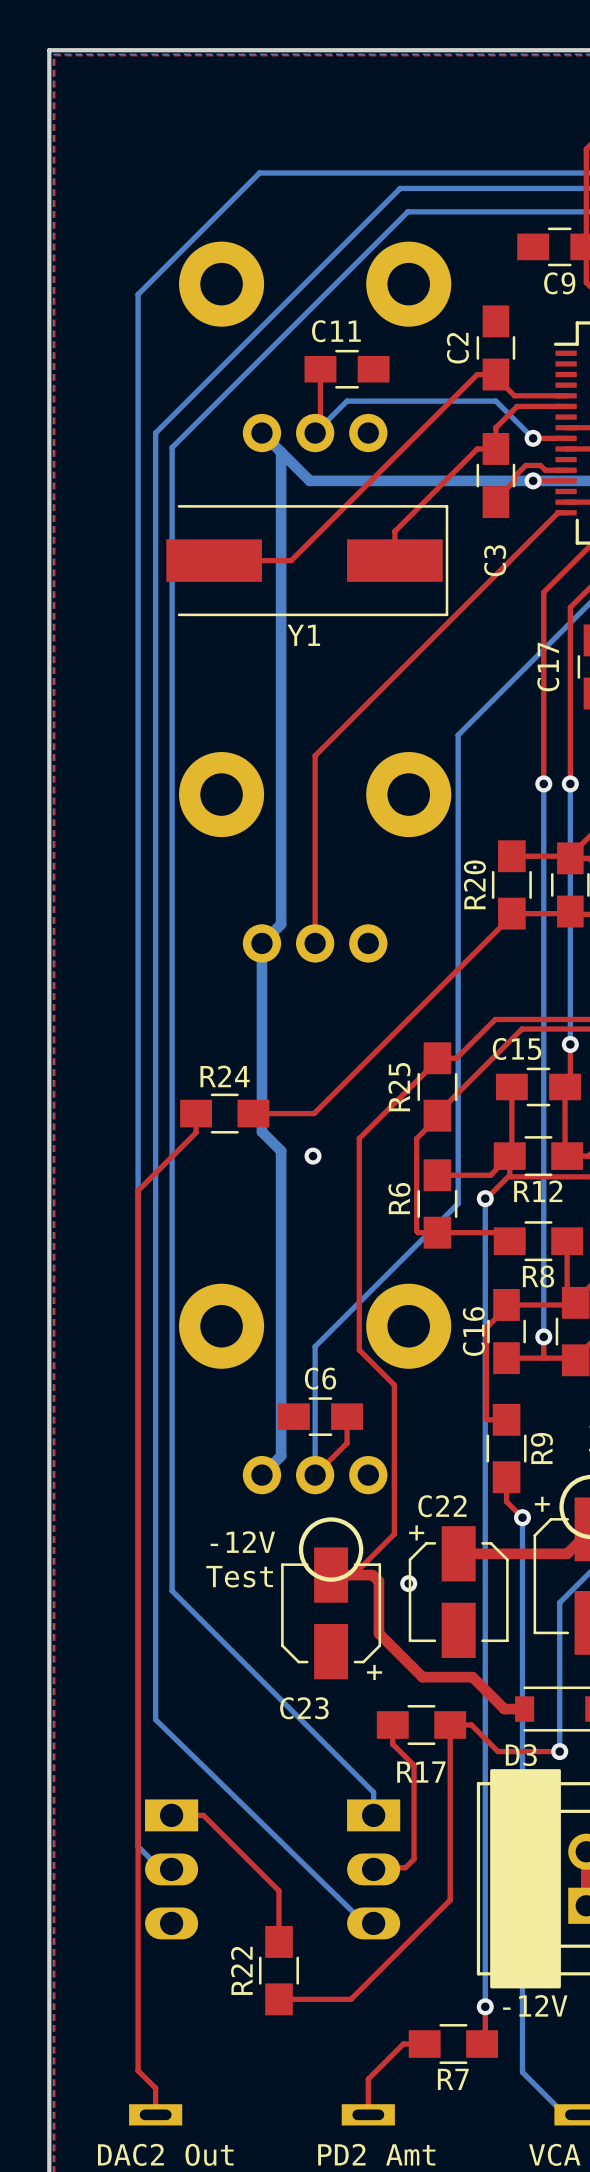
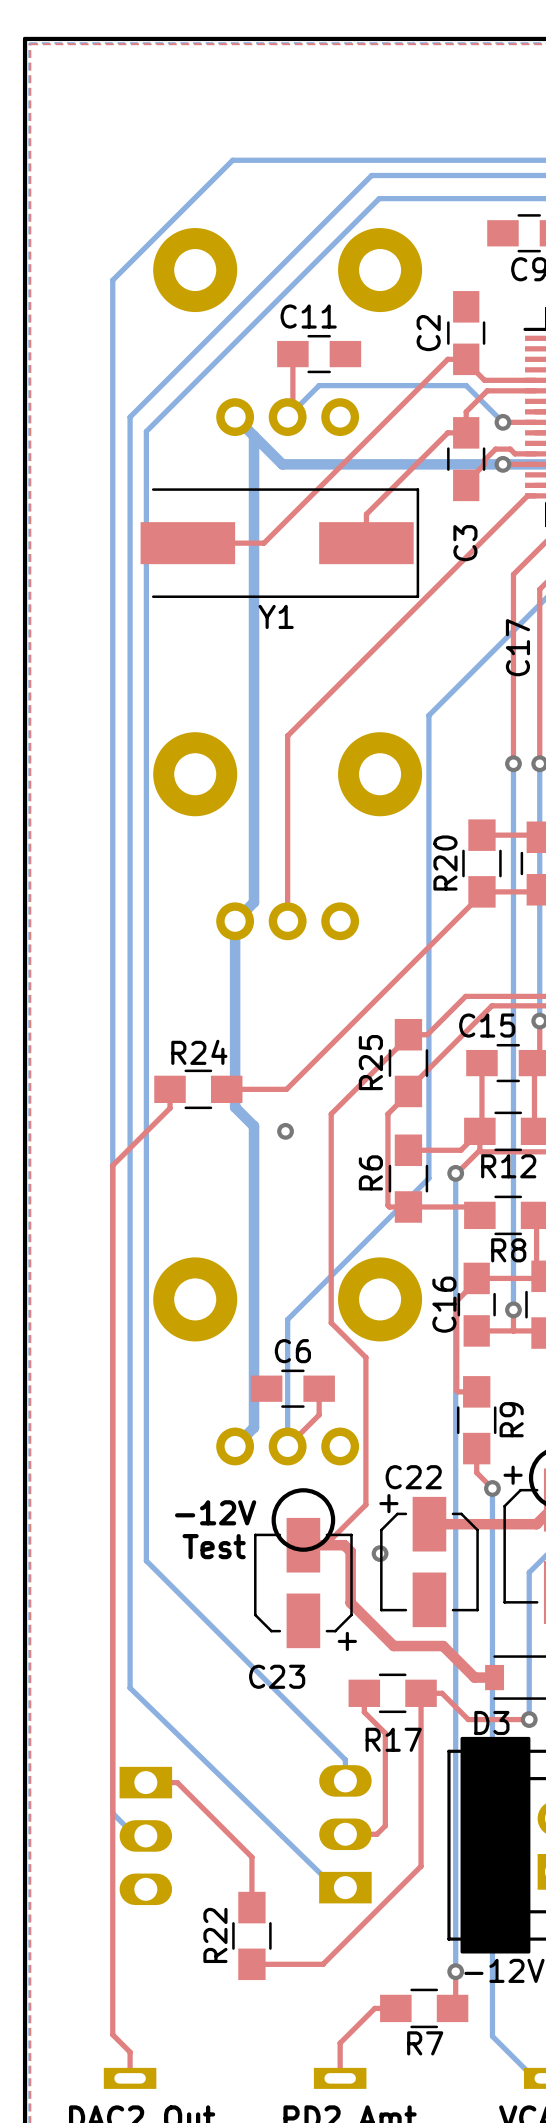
part rotation: 0° (373, 1869) -> 180° (345, 1834)

